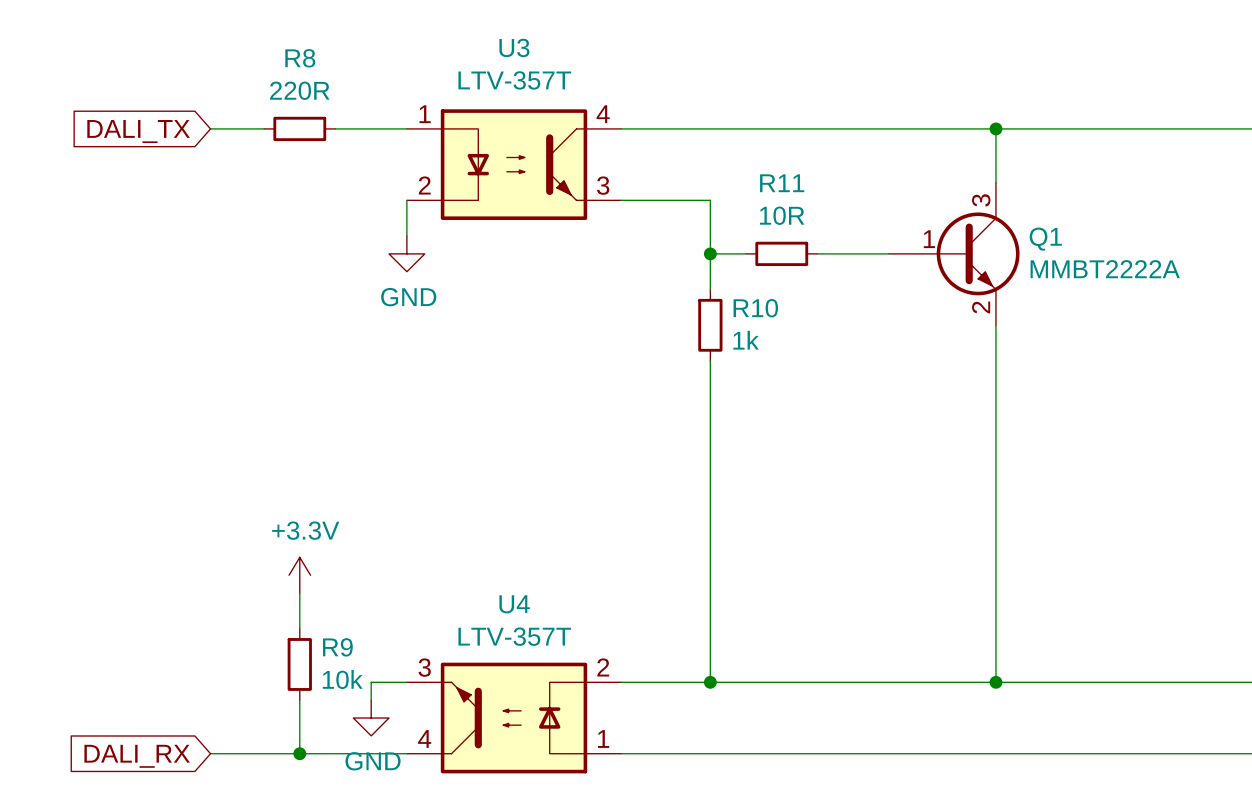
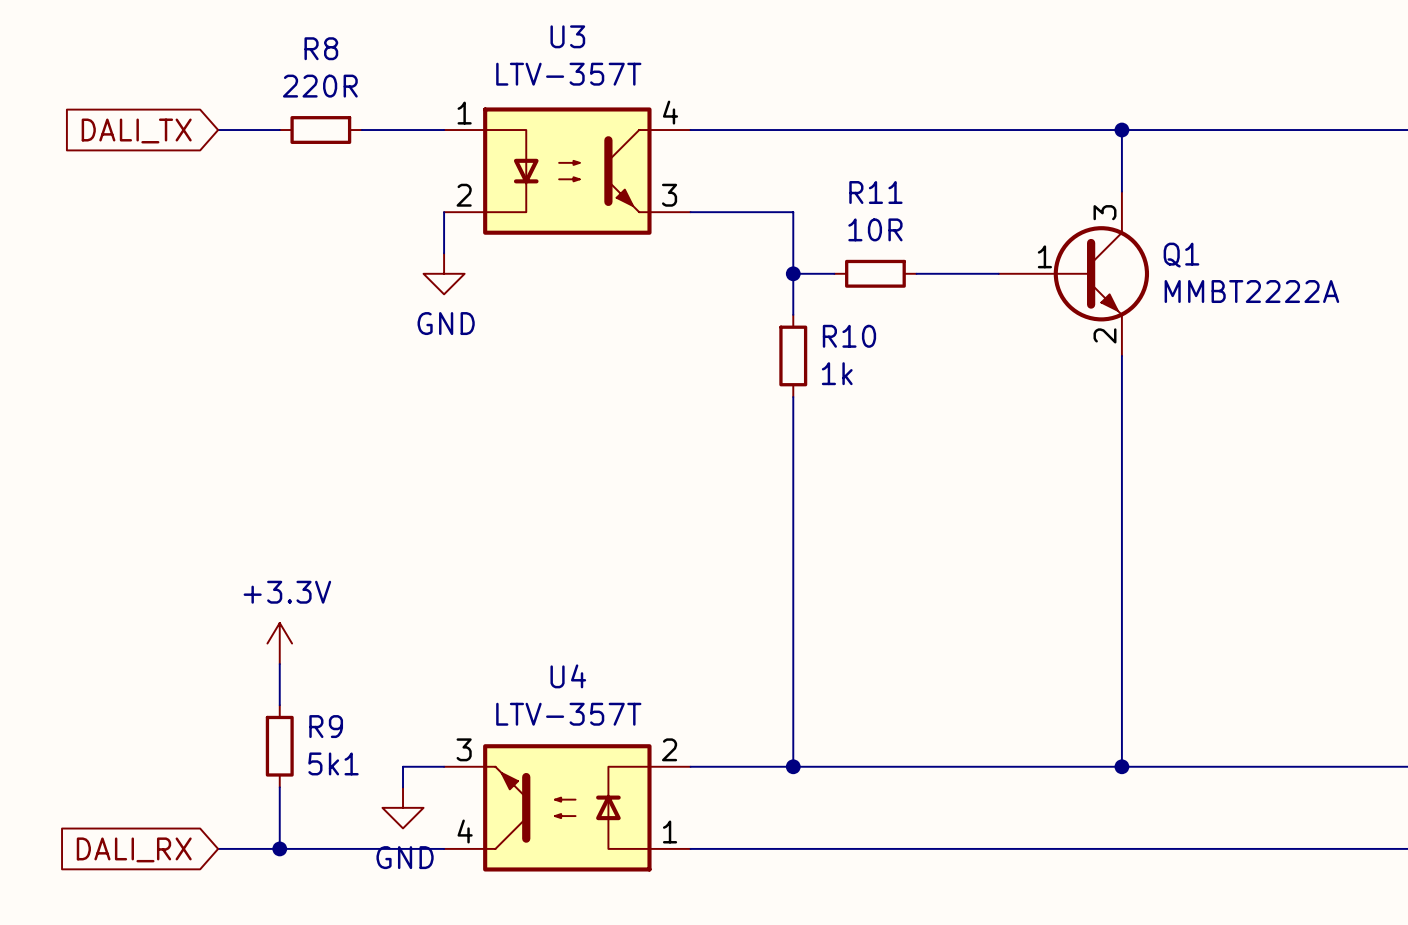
power symbol position: +3.3V (299, 575) -> +3.3V (279, 643)
wire: (299, 593) (299, 628) -> (279, 664) (279, 705)
R9 position: (299, 664) -> (279, 746)
R9 value: 10k (342, 679) -> 5k1 (333, 763)
wire: (299, 700) (299, 753) -> (279, 787) (279, 848)
junction position: (299, 753) -> (279, 848)

